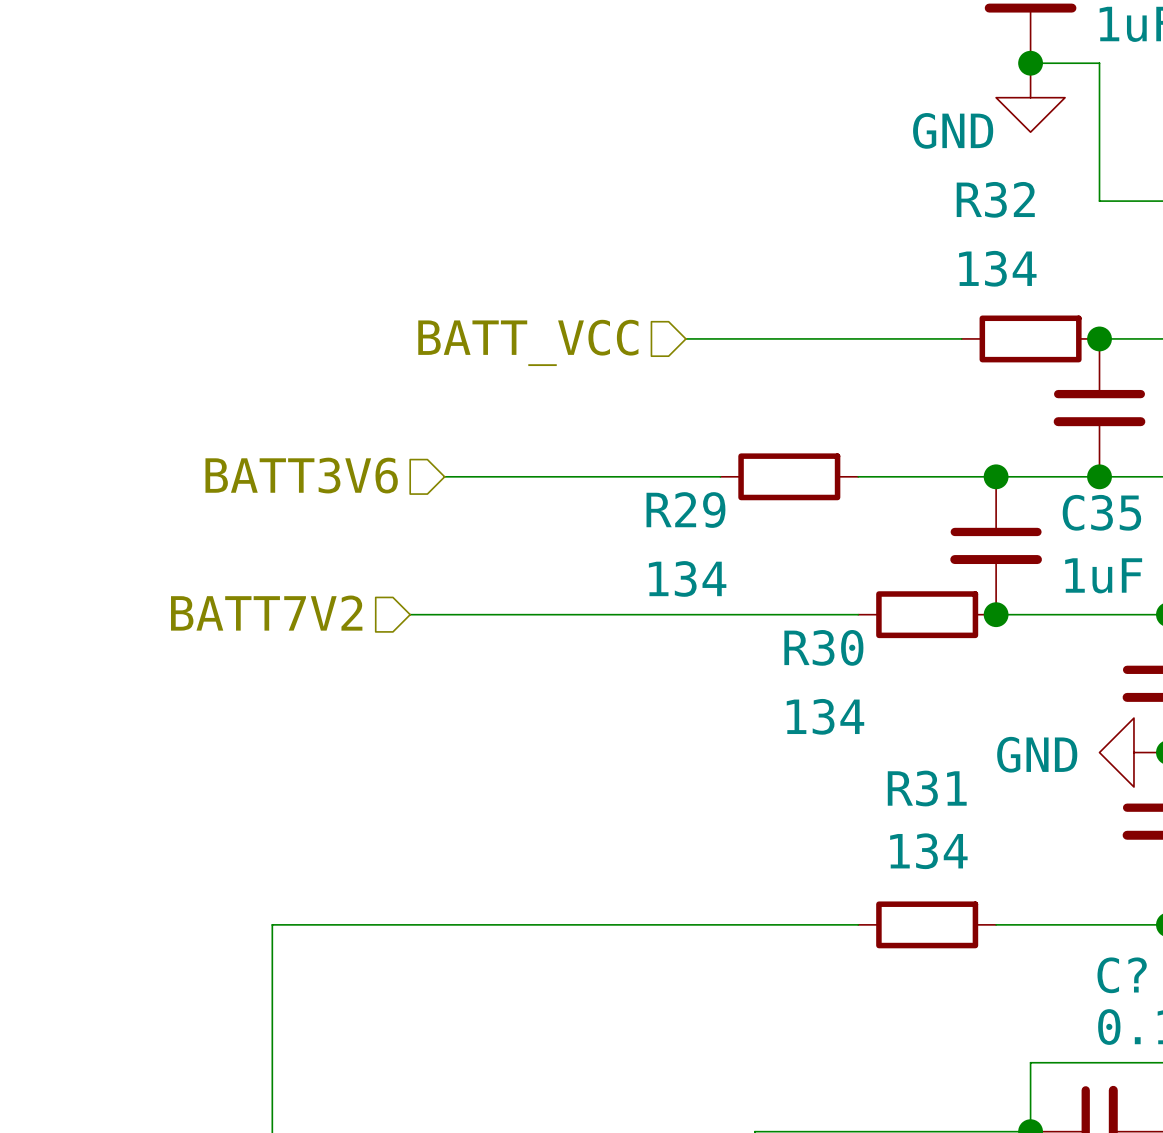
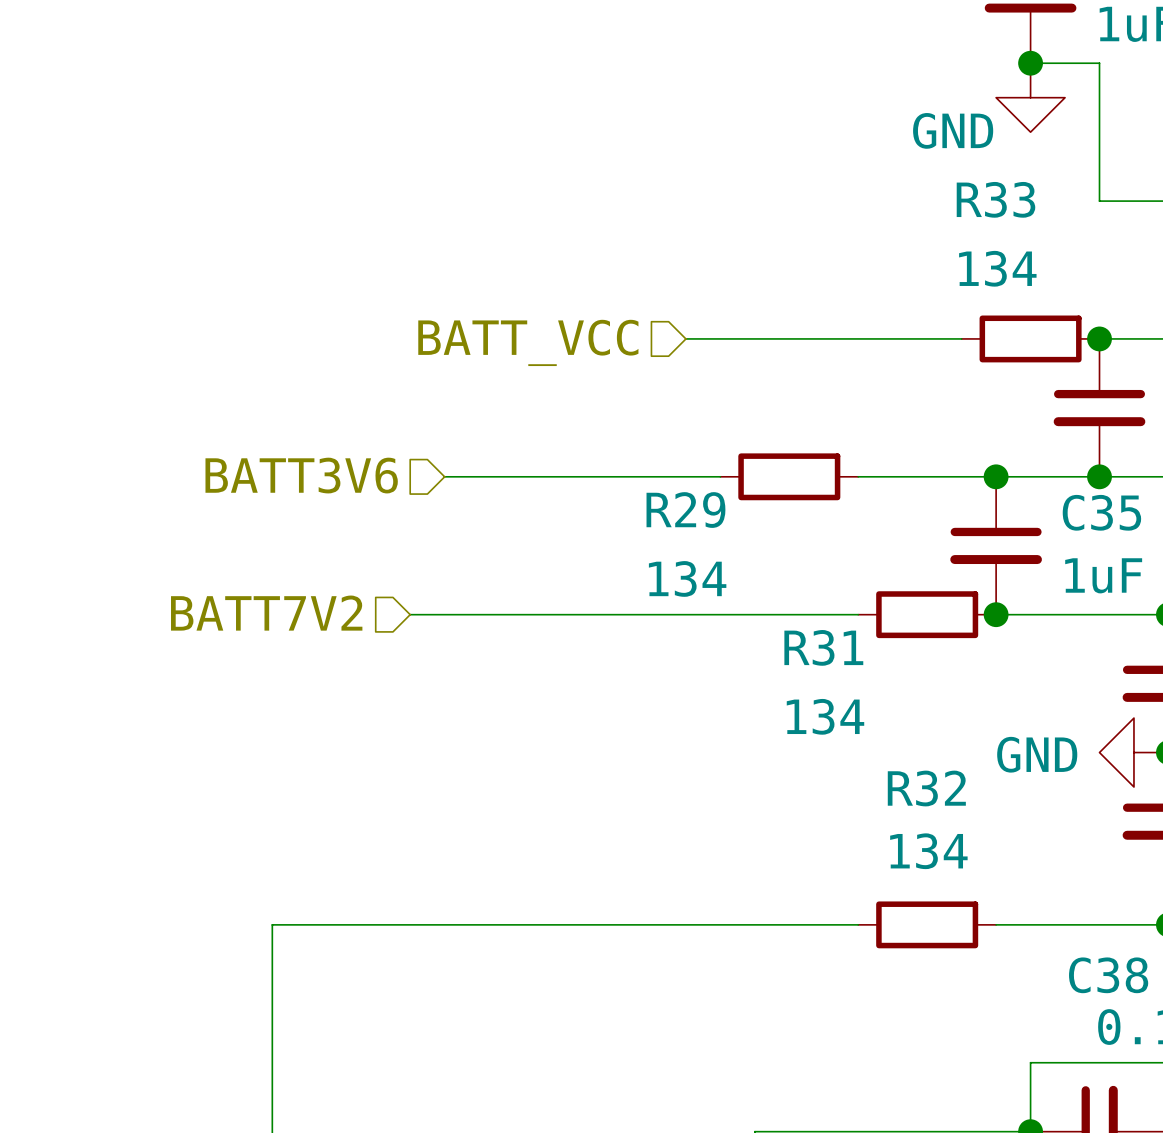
R32 name: R32 (995, 199) -> R33 (995, 199)
R30 name: R30 (823, 647) -> R31 (823, 647)
R31 name: R31 (927, 788) -> R32 (926, 788)
C? name: C? (1122, 975) -> C38 (1108, 975)

